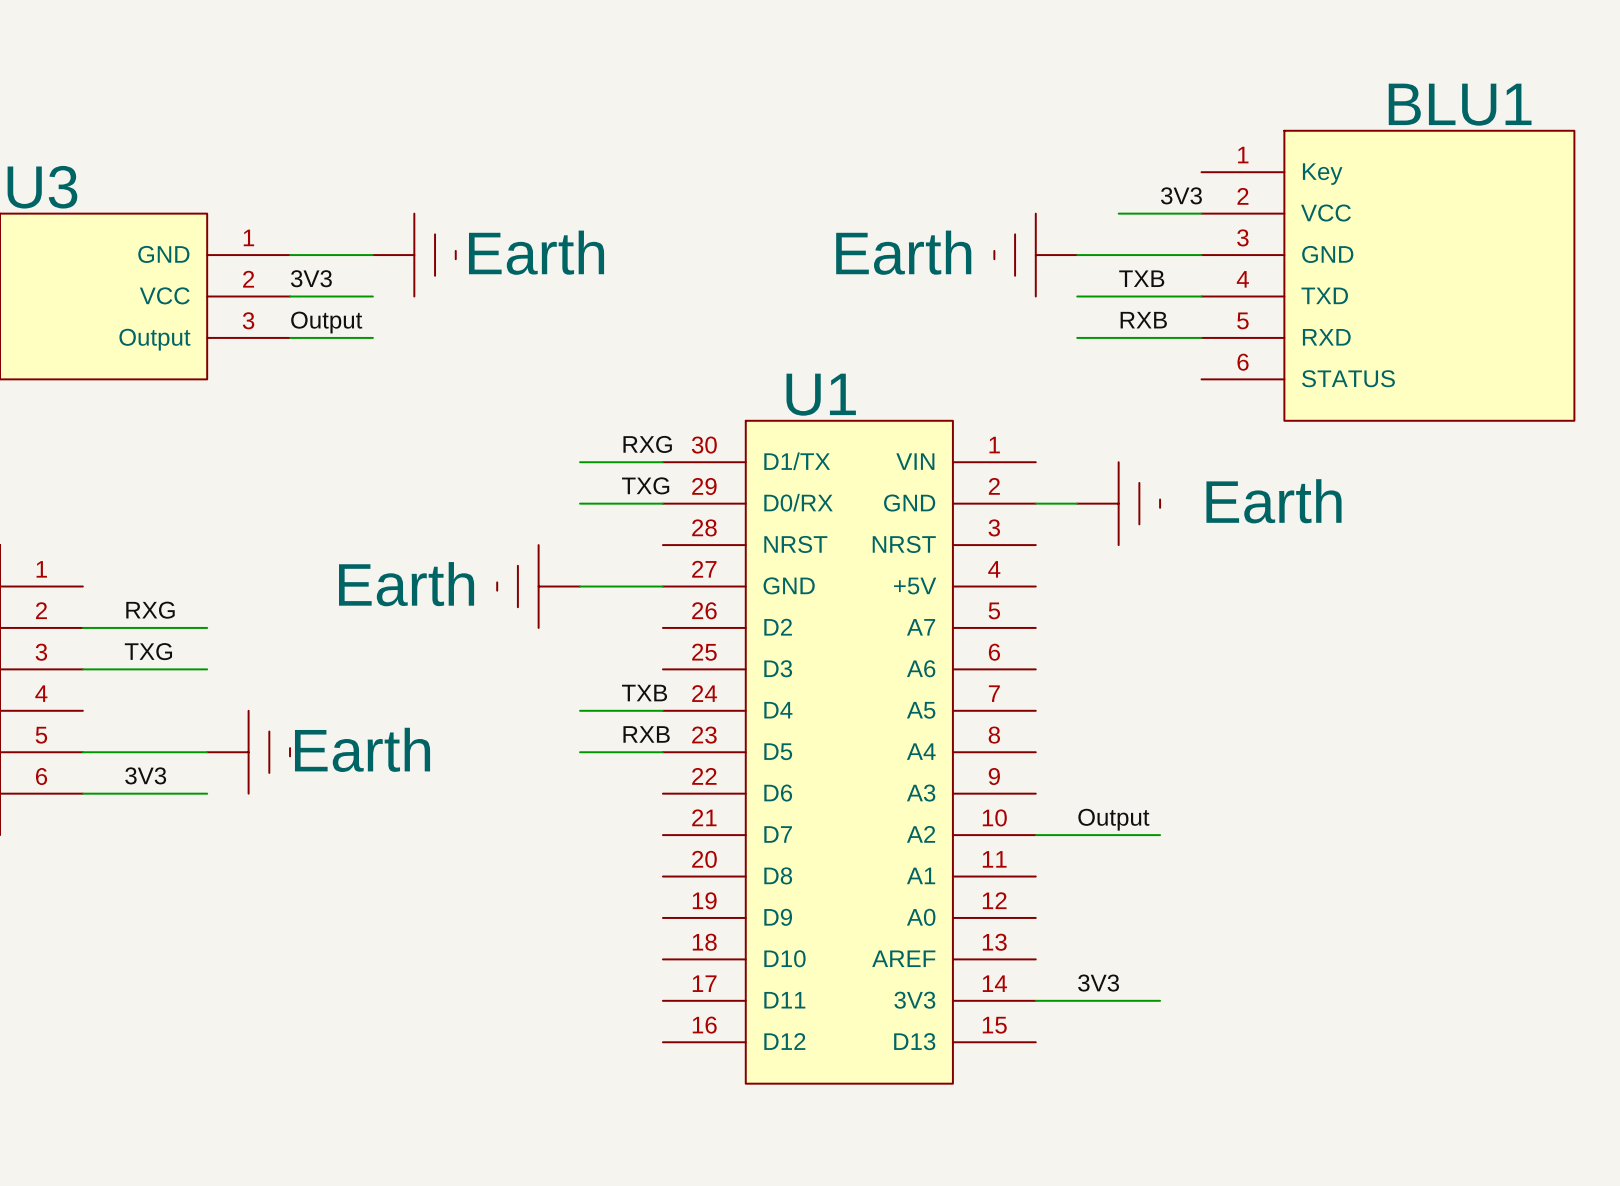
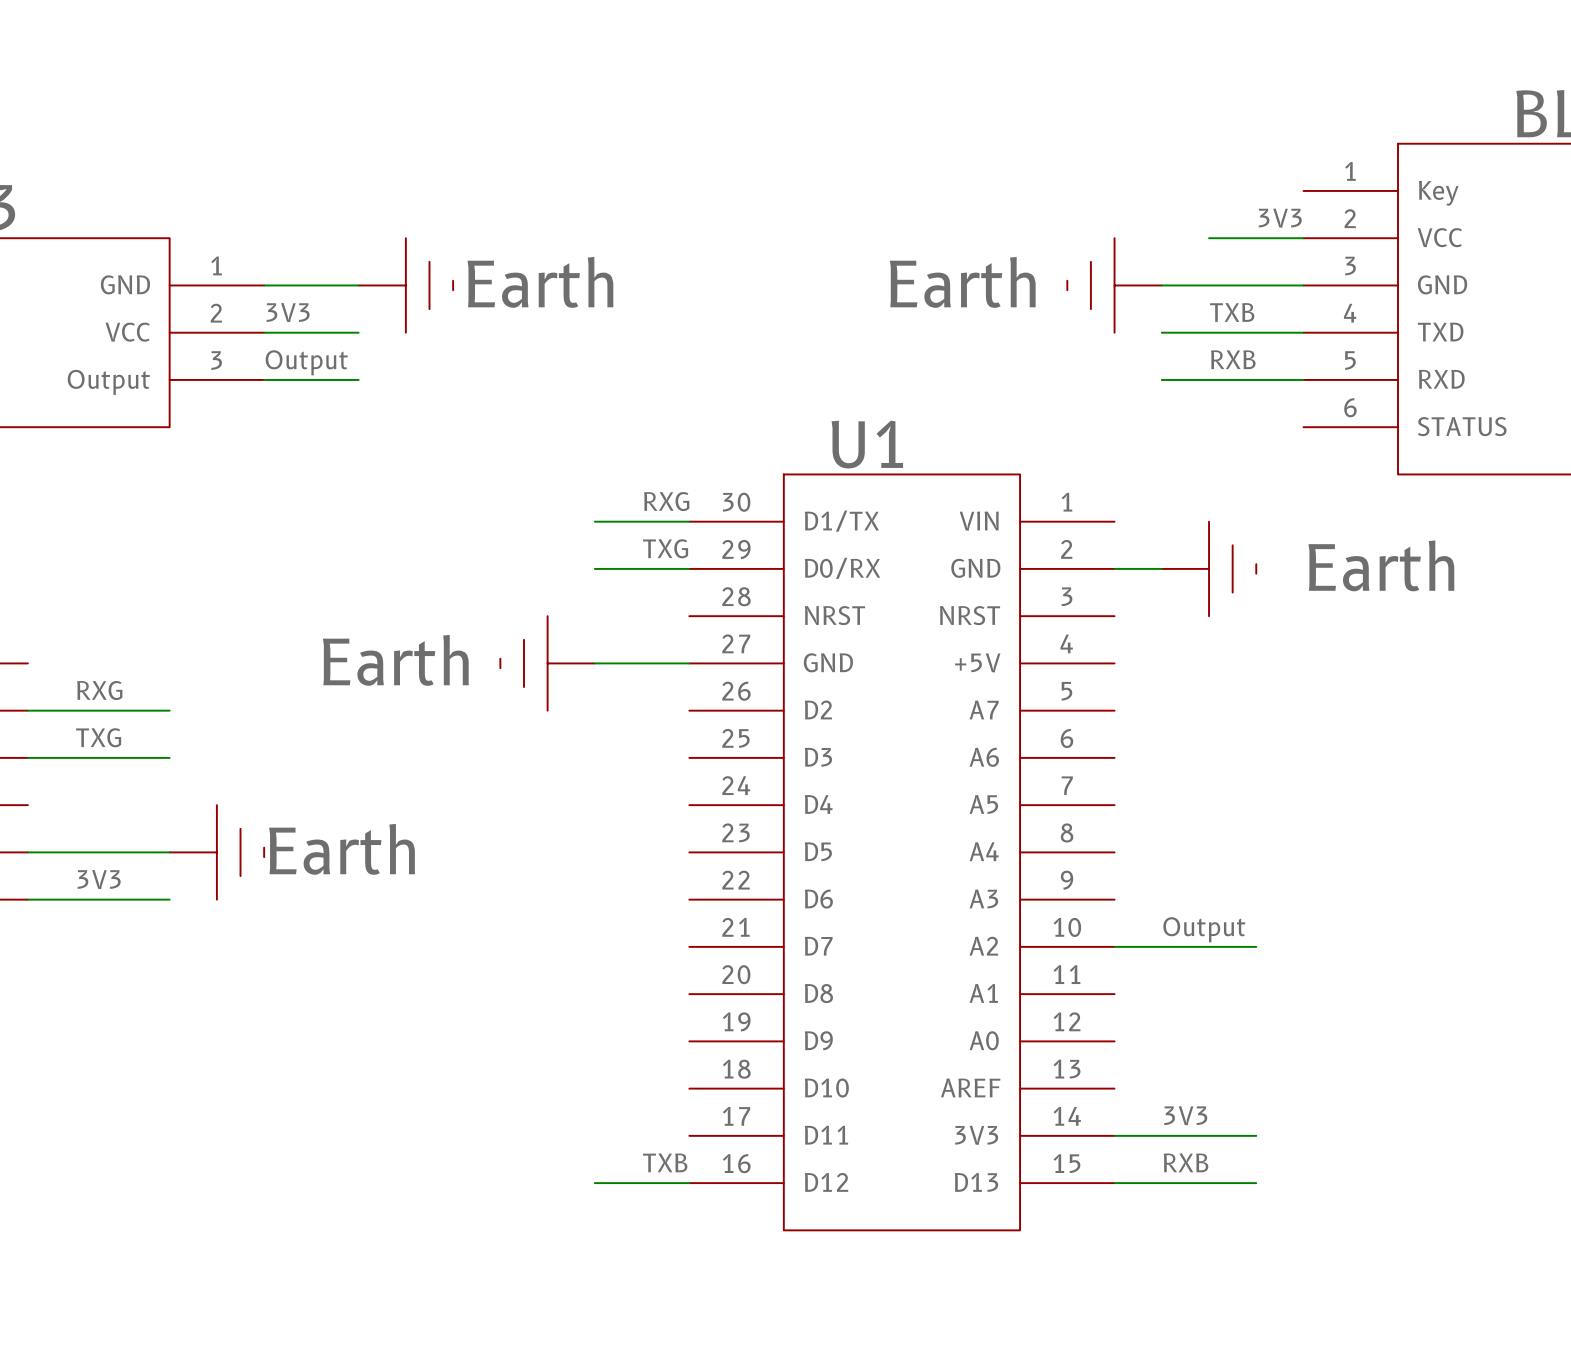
label position: TXB (644, 693) -> TXB (665, 1162)
wire: (580, 710) (662, 710) -> none
label position: RXB (646, 734) -> RXB (1186, 1162)
wire: (580, 752) (662, 752) -> (594, 1183) (689, 1183)
wire: none -> (1114, 1183) (1256, 1183)

